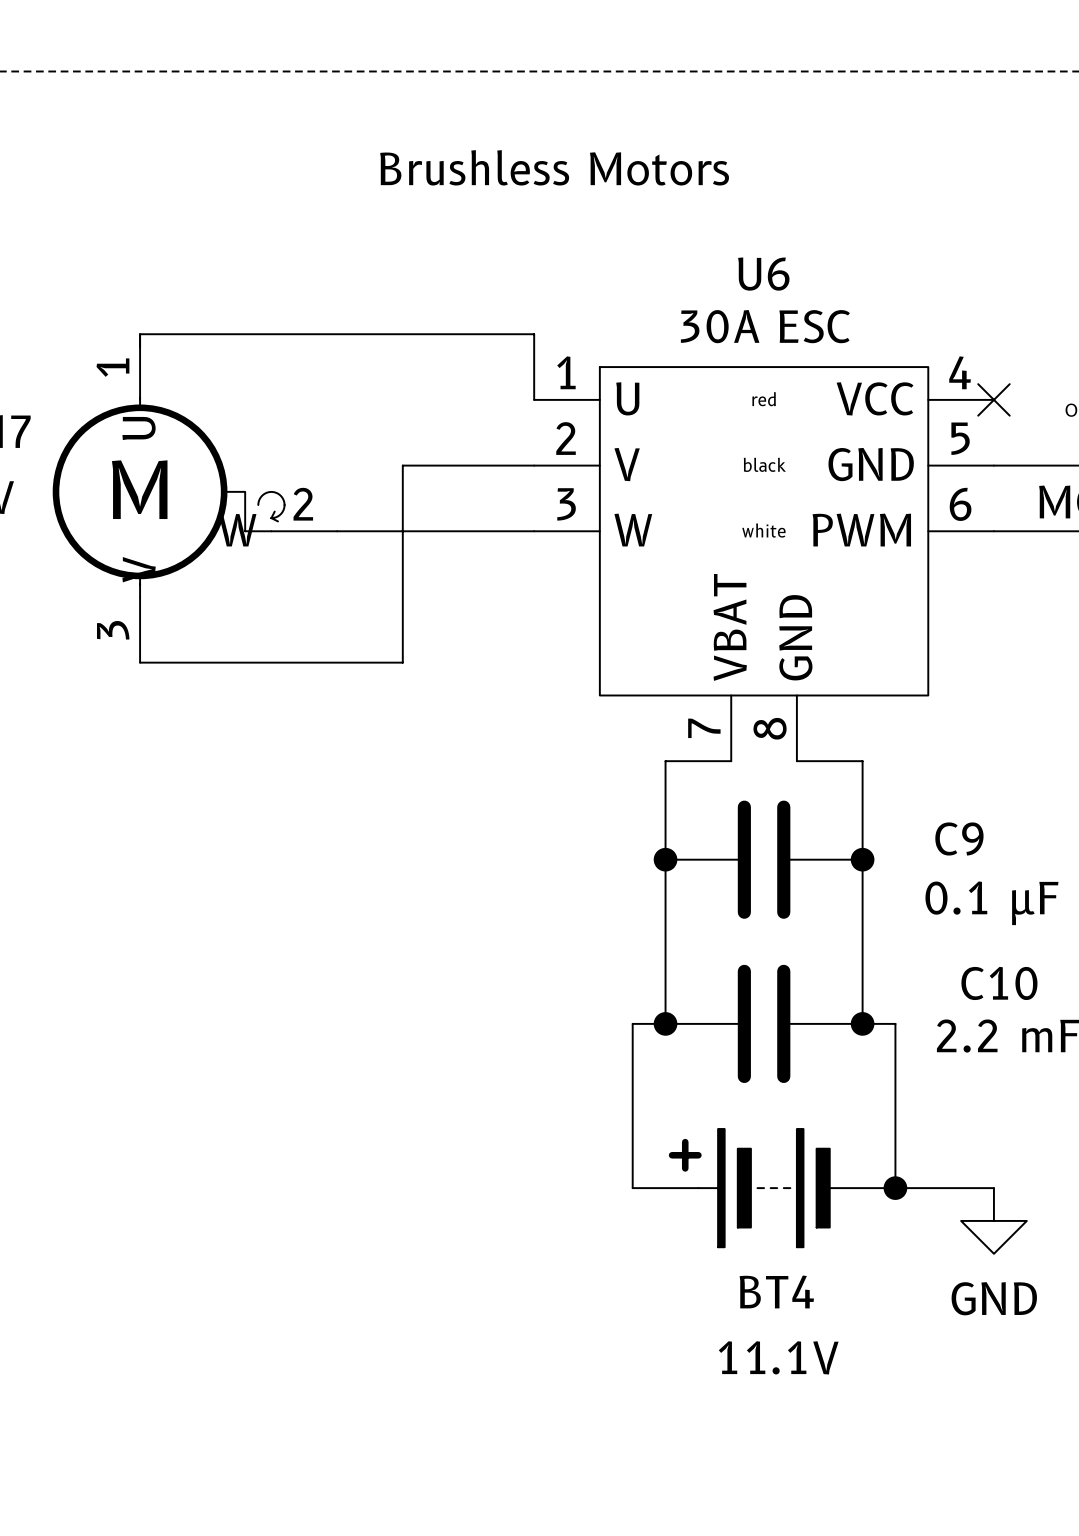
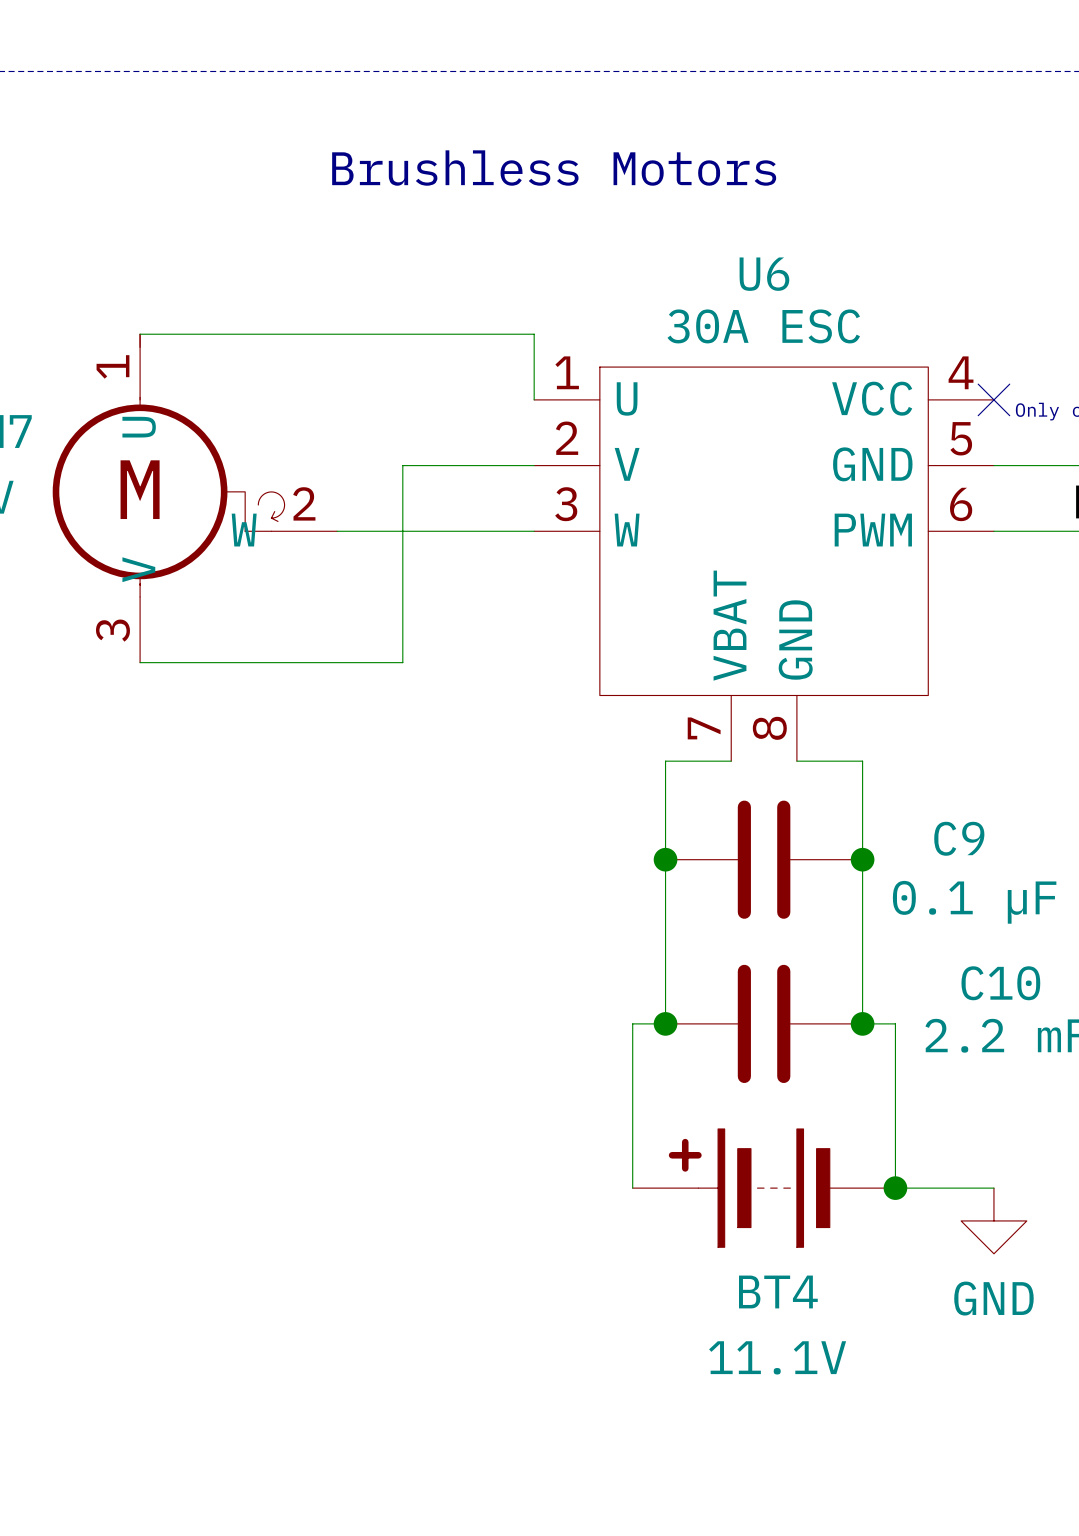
text: red (764, 399) -> none
text: black (764, 464) -> none
text: white (763, 530) -> none

